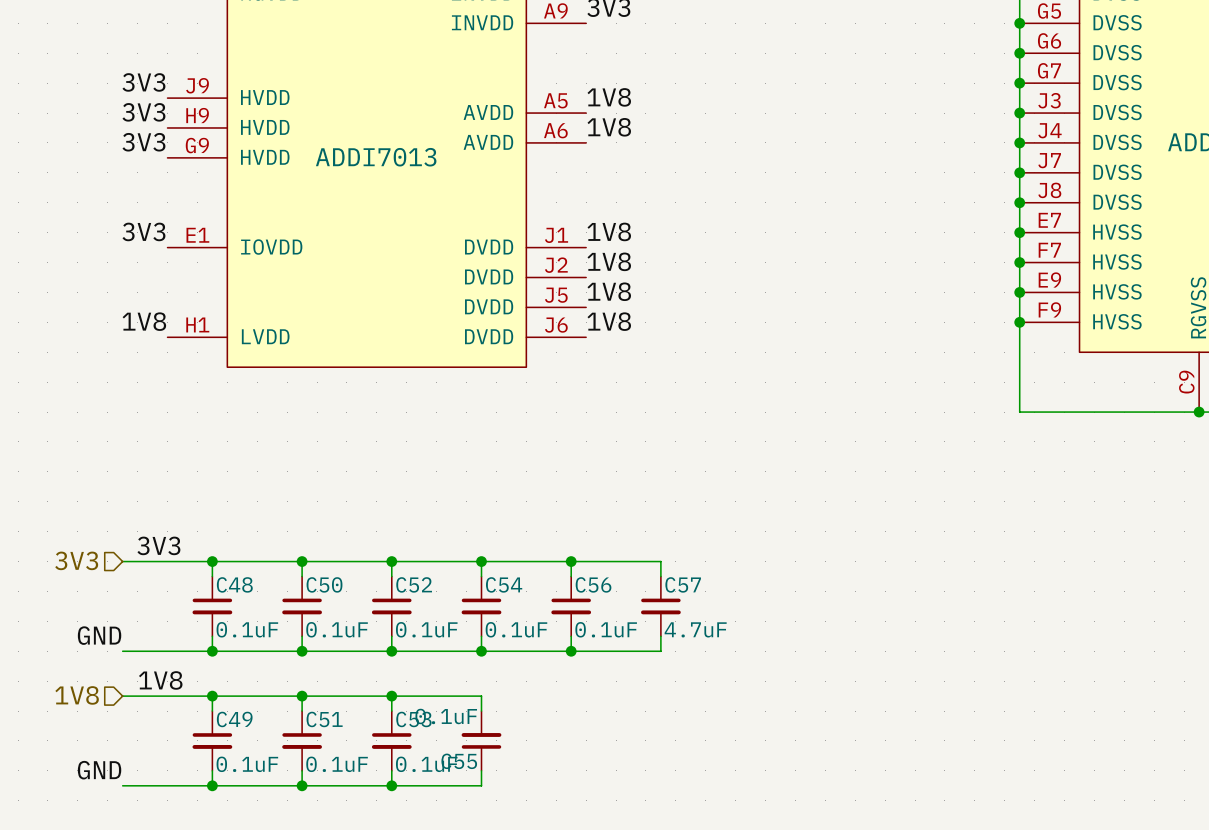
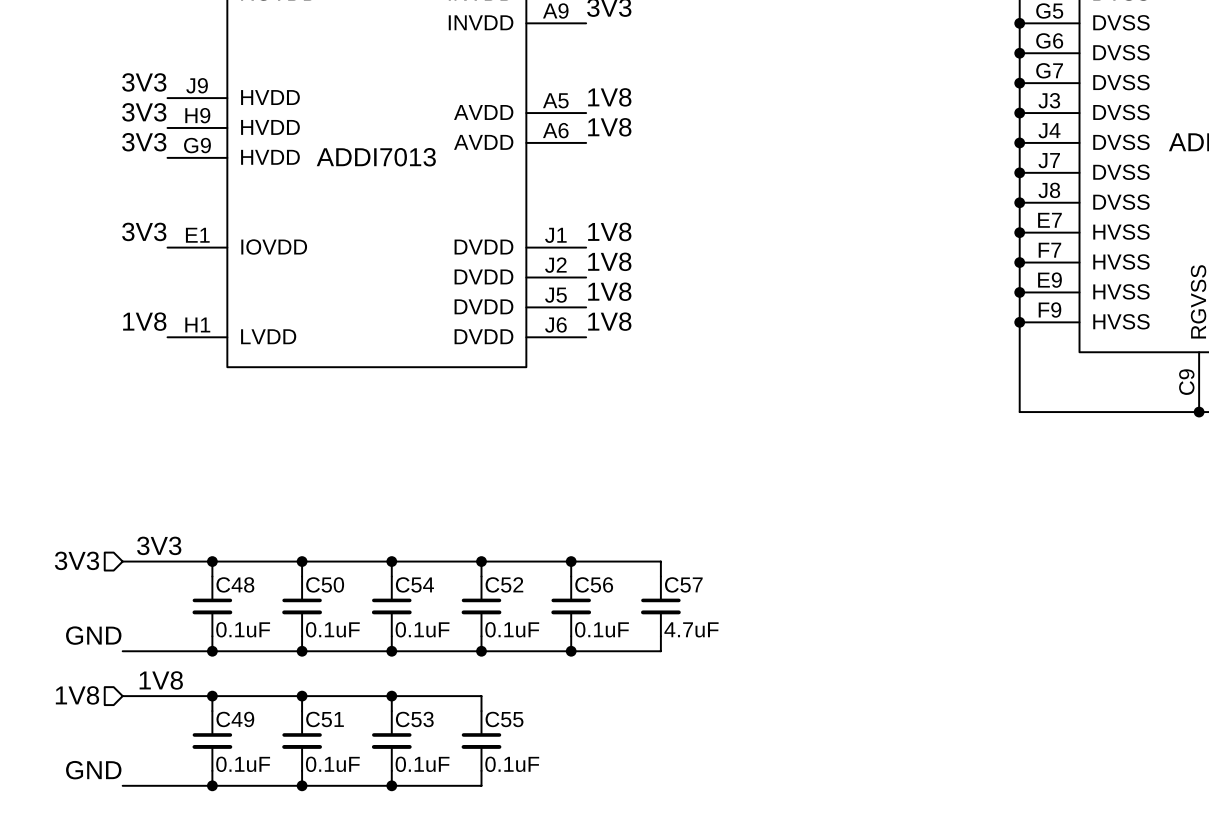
C52 name: C52 (414, 584) -> C54 (414, 584)
C54 name: C54 (504, 584) -> C52 (504, 584)
C55 rotation: 0° (481, 740) -> 180° (481, 741)

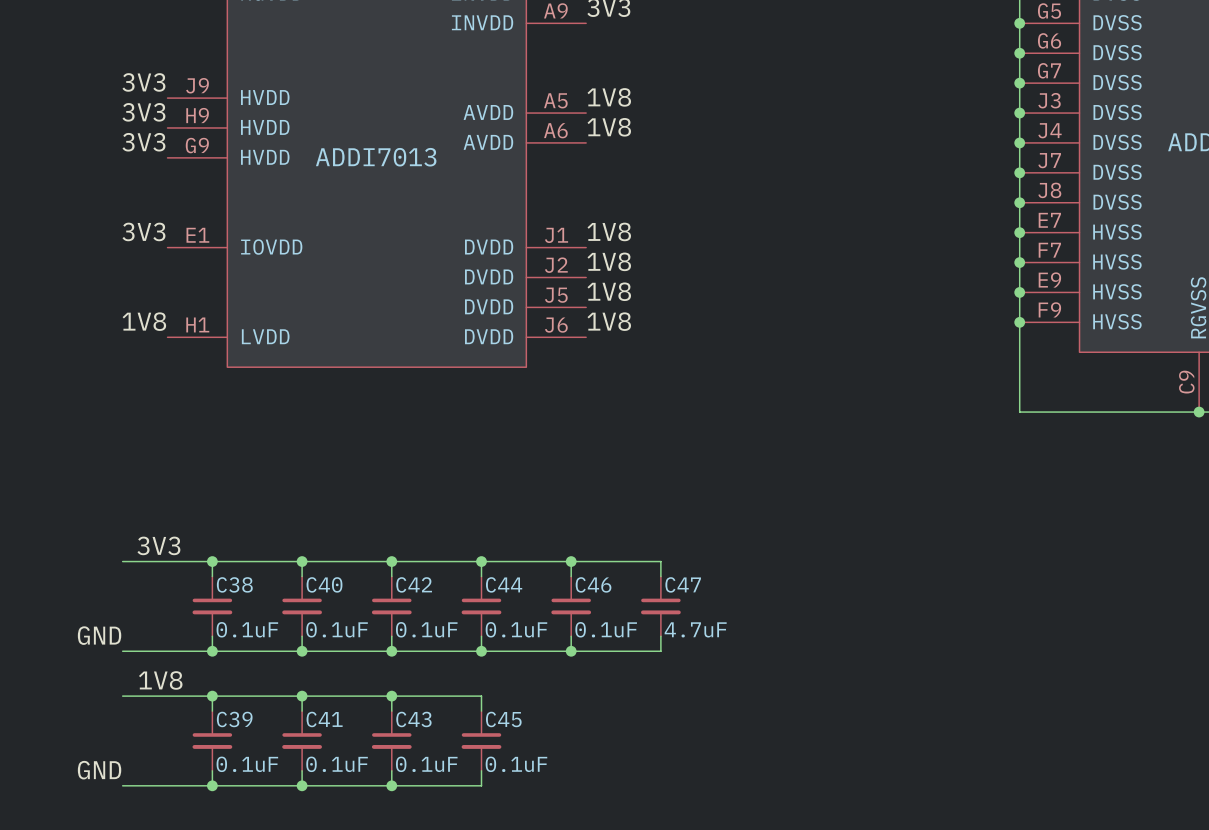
hierarchical label: 3V3 (76, 560) -> none
C48 name: C48 (235, 584) -> C38 (234, 584)
C50 name: C50 (325, 584) -> C40 (324, 584)
C54 name: C54 (414, 584) -> C42 (414, 584)
C52 name: C52 (504, 584) -> C44 (504, 584)
C56 name: C56 (594, 584) -> C46 (593, 584)
C57 name: C57 (683, 584) -> C47 (683, 584)
hierarchical label: 1V8 (77, 695) -> none
C49 name: C49 (235, 719) -> C39 (234, 719)
C51 name: C51 (325, 719) -> C41 (324, 719)
C53 name: C53 (414, 719) -> C43 (413, 719)
C55 name: C55 (504, 719) -> C45 (503, 719)

